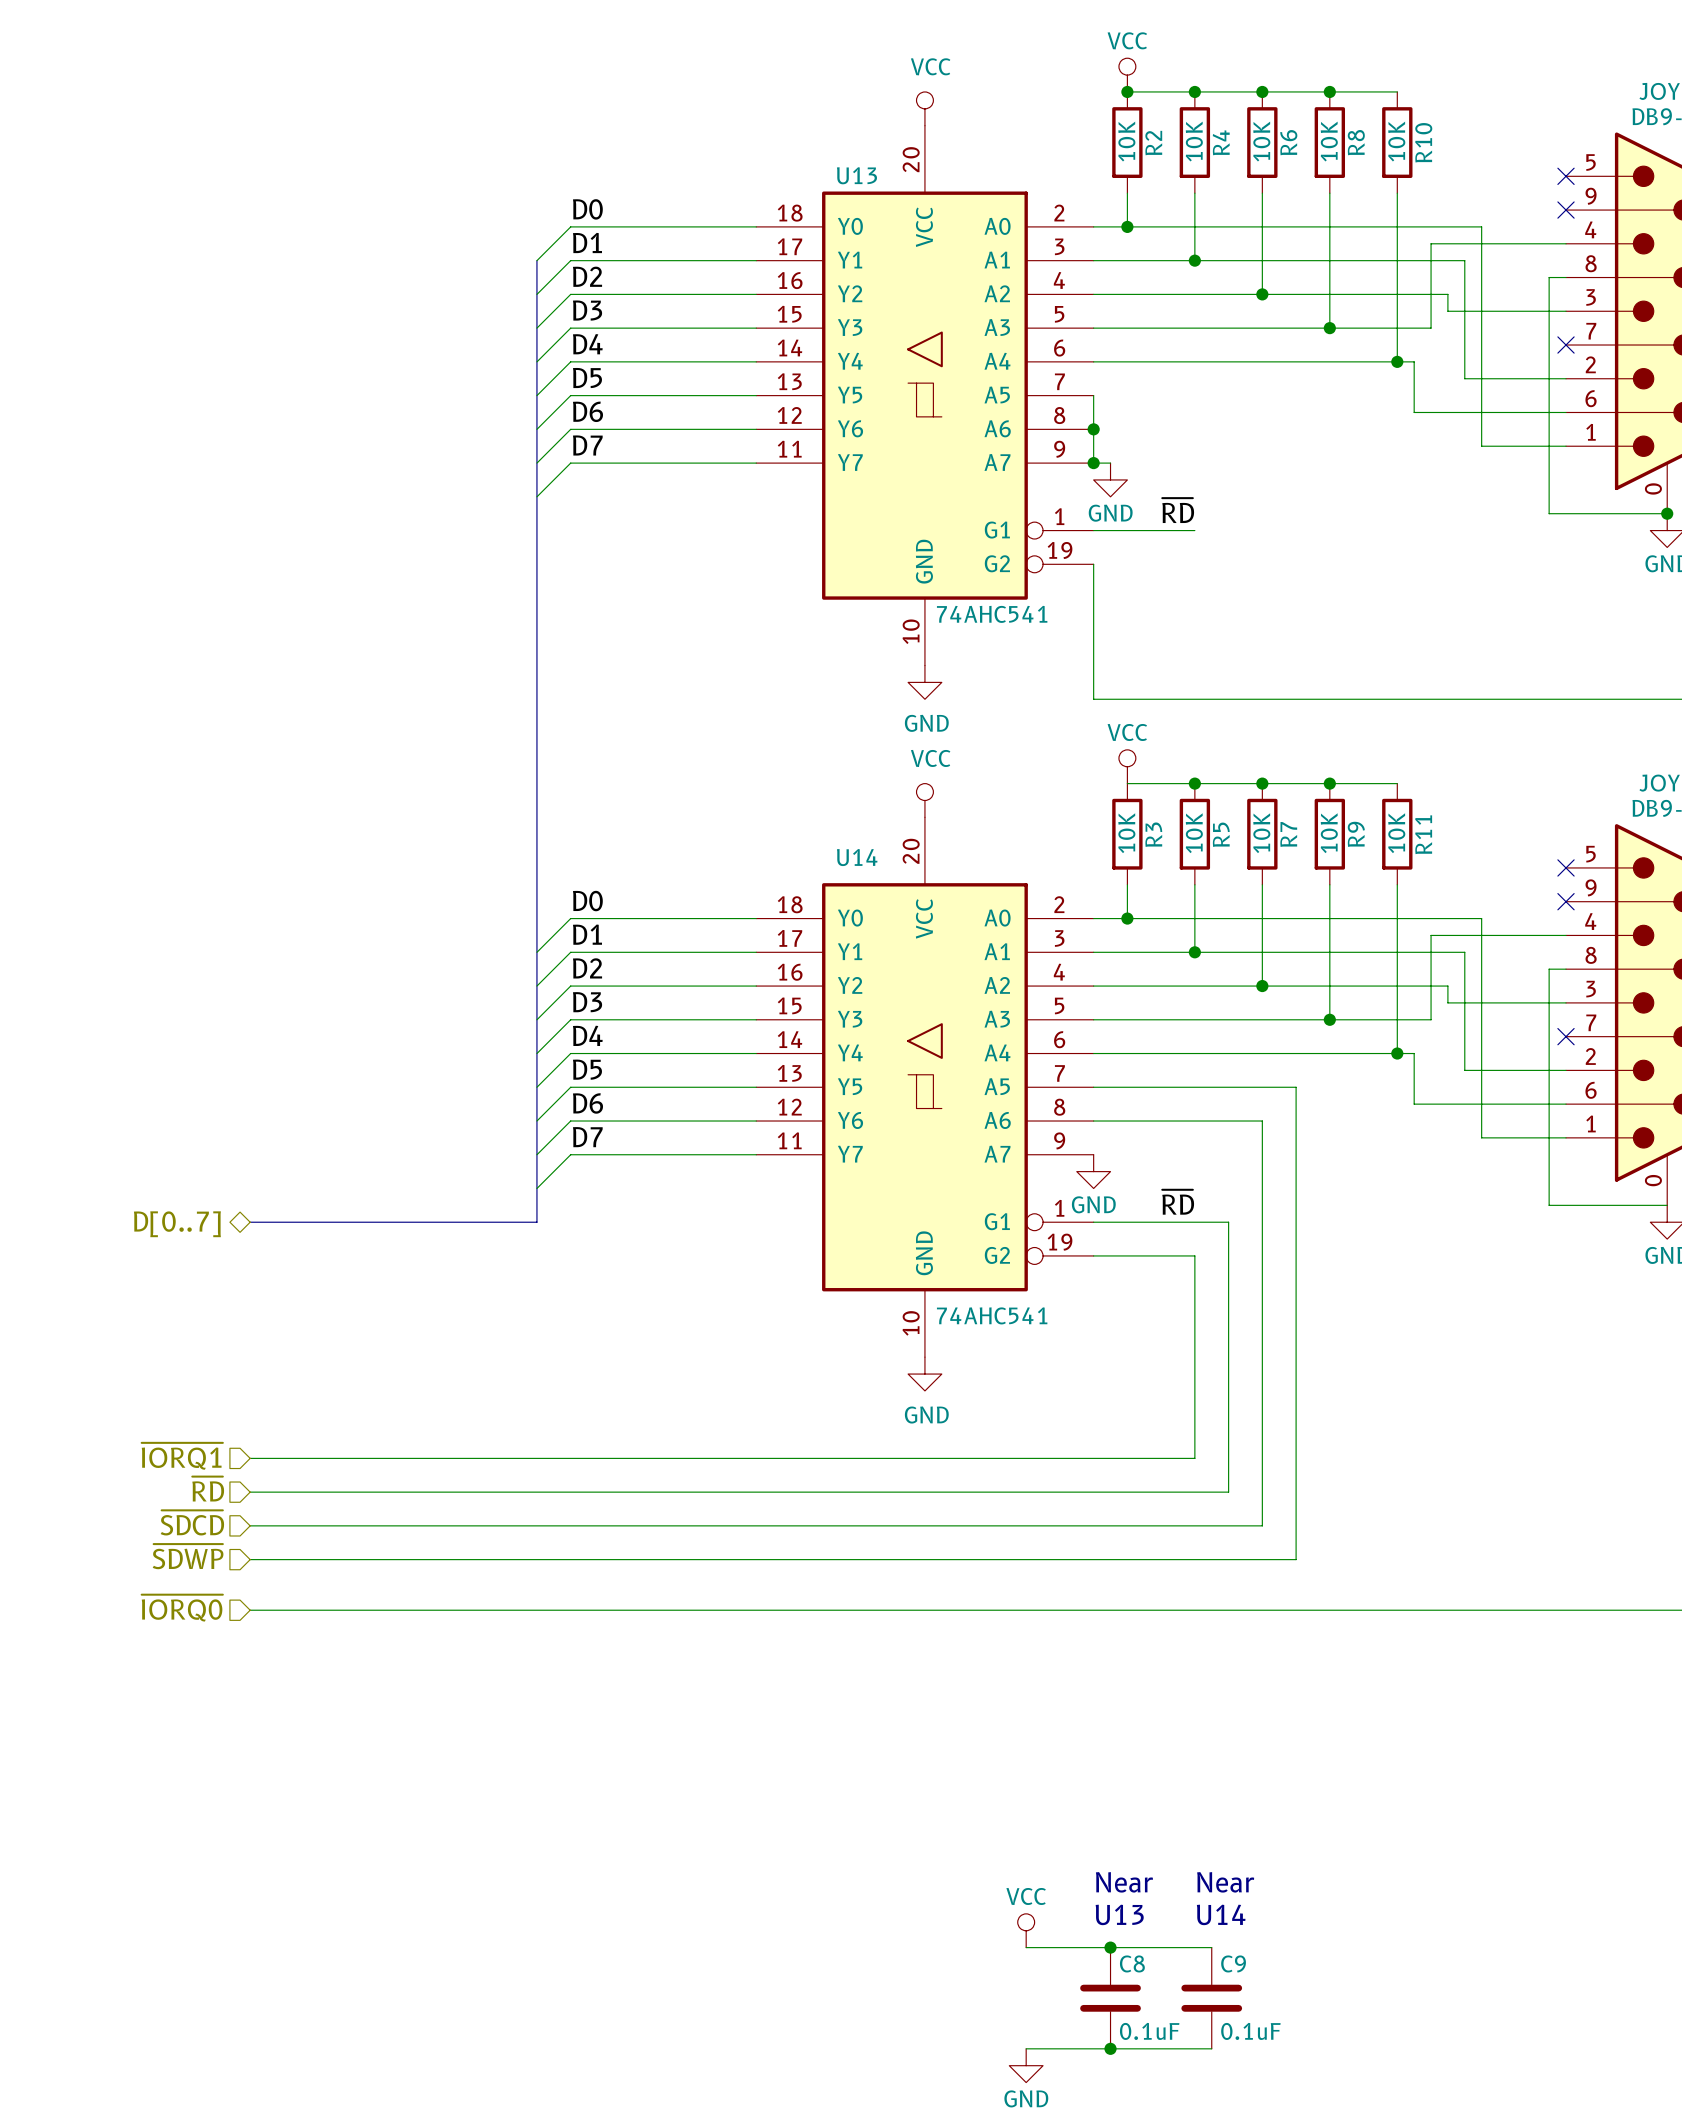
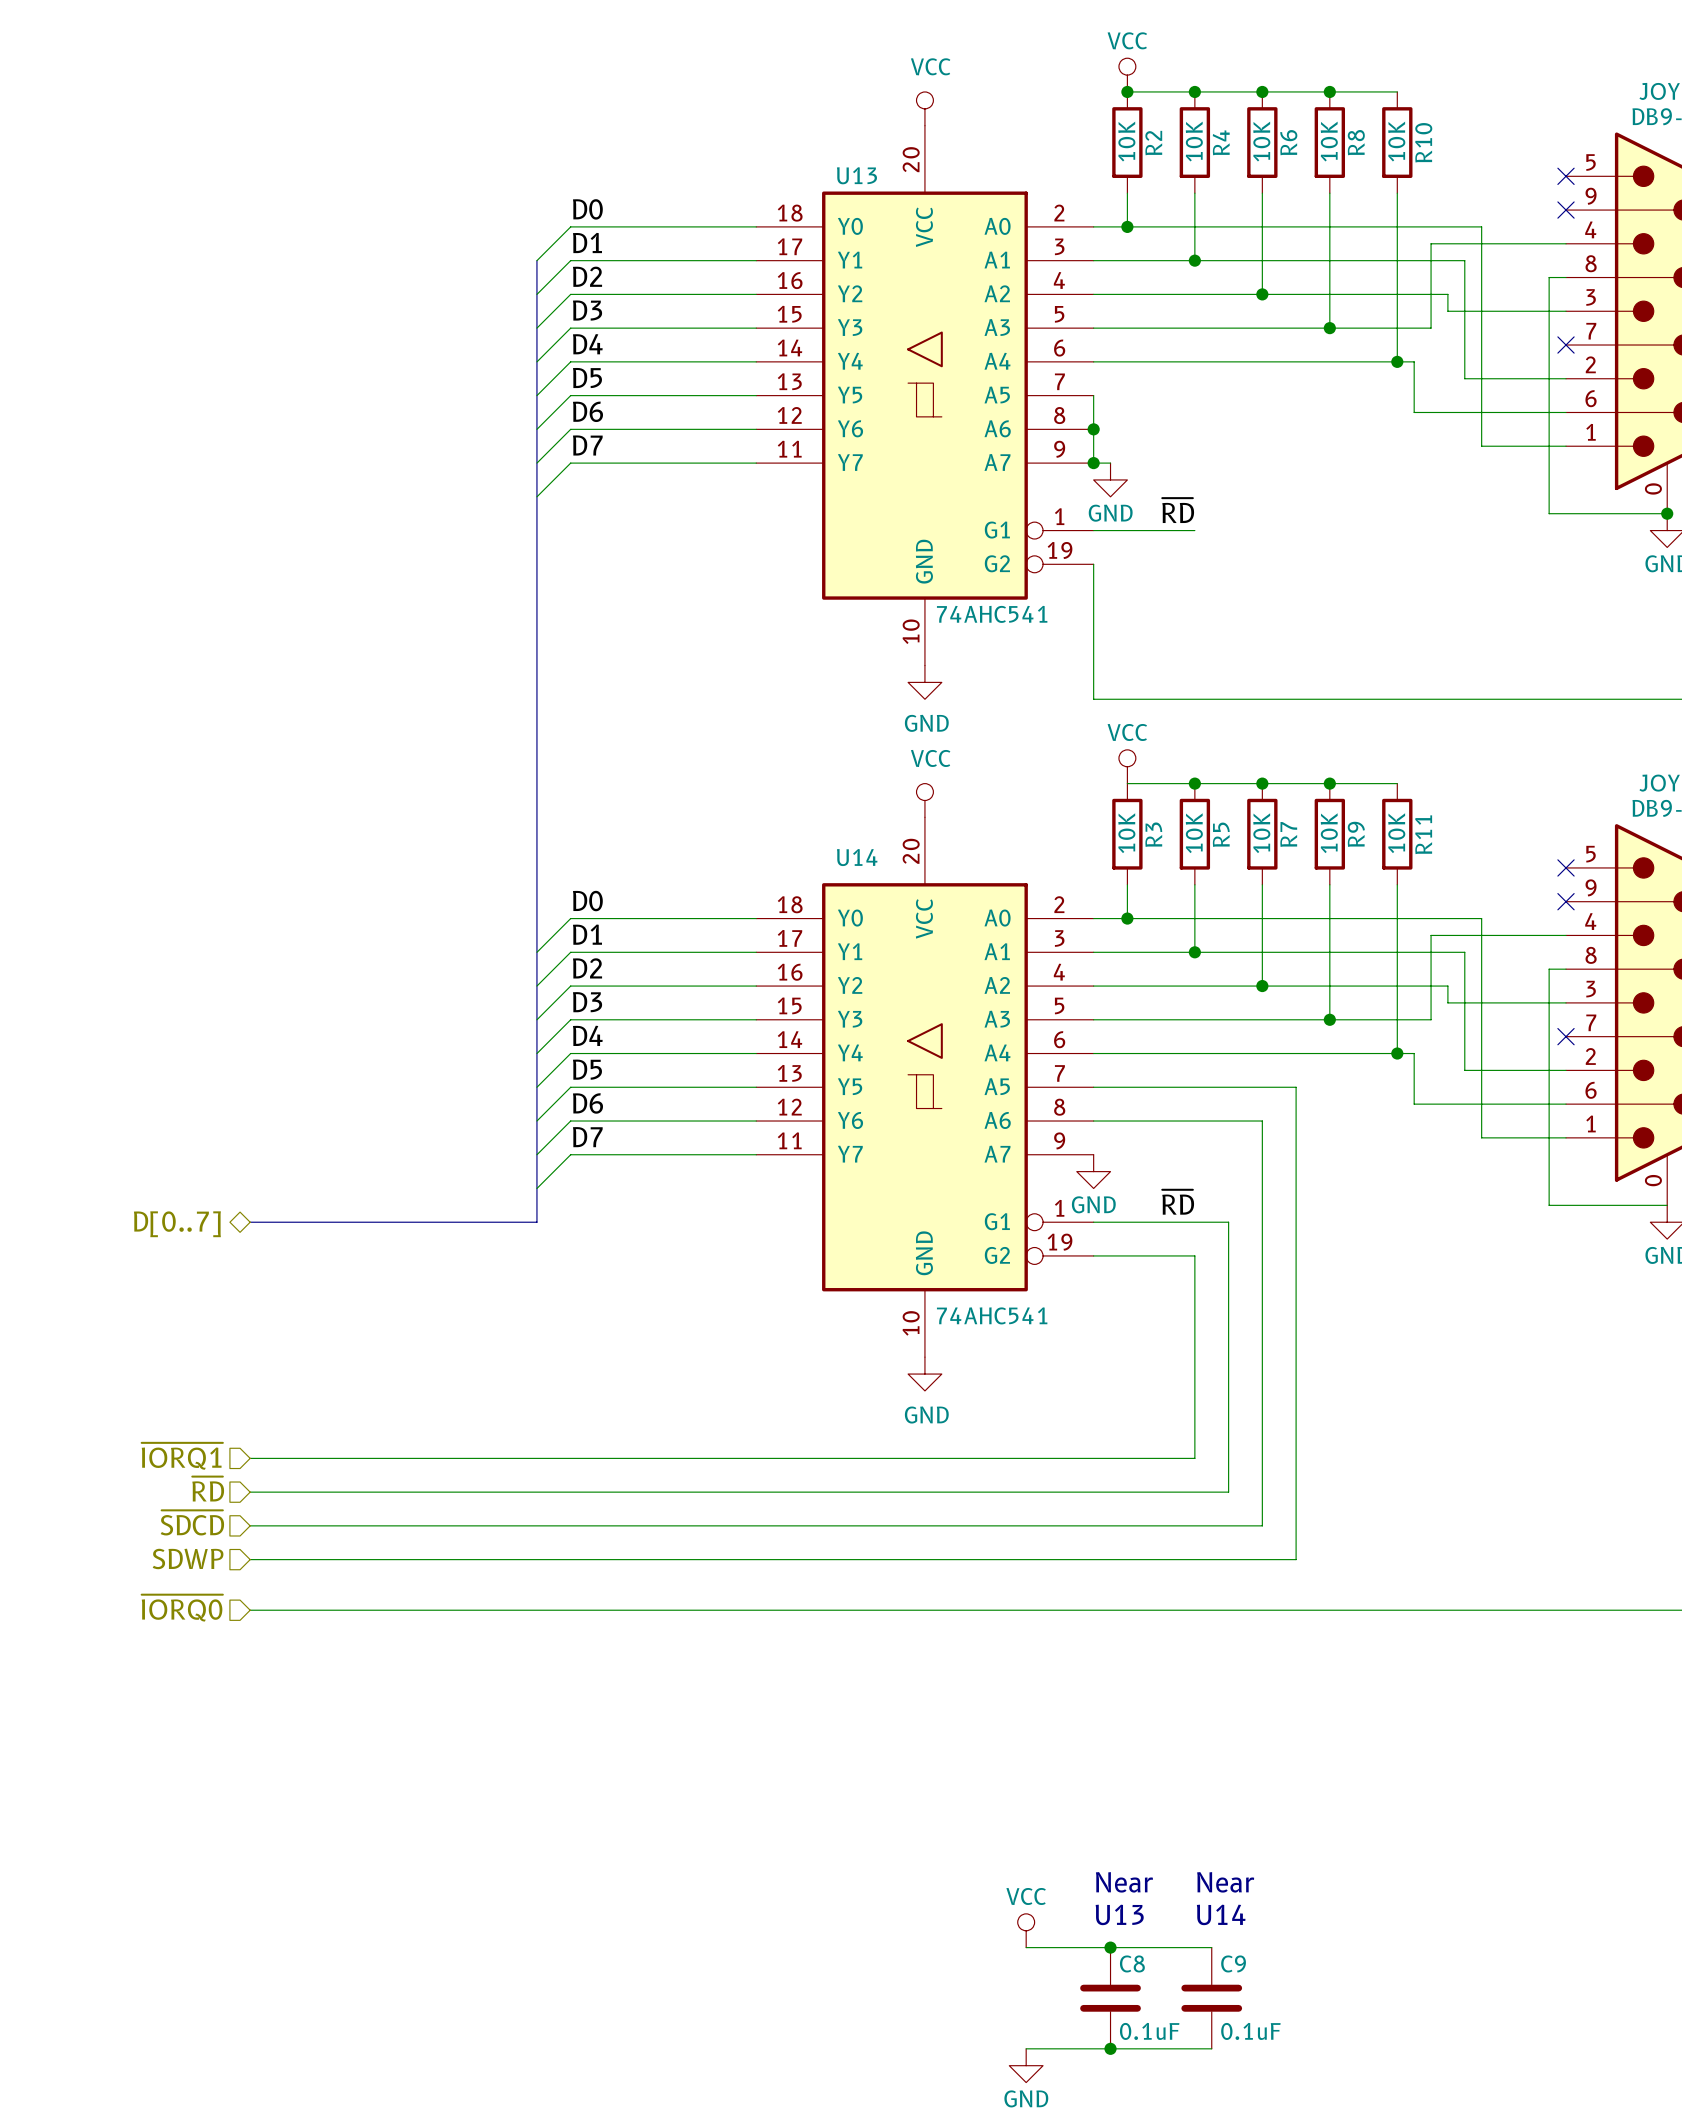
hierarchical label: ~{SDWP} (188, 1556) -> SDWP (188, 1558)

